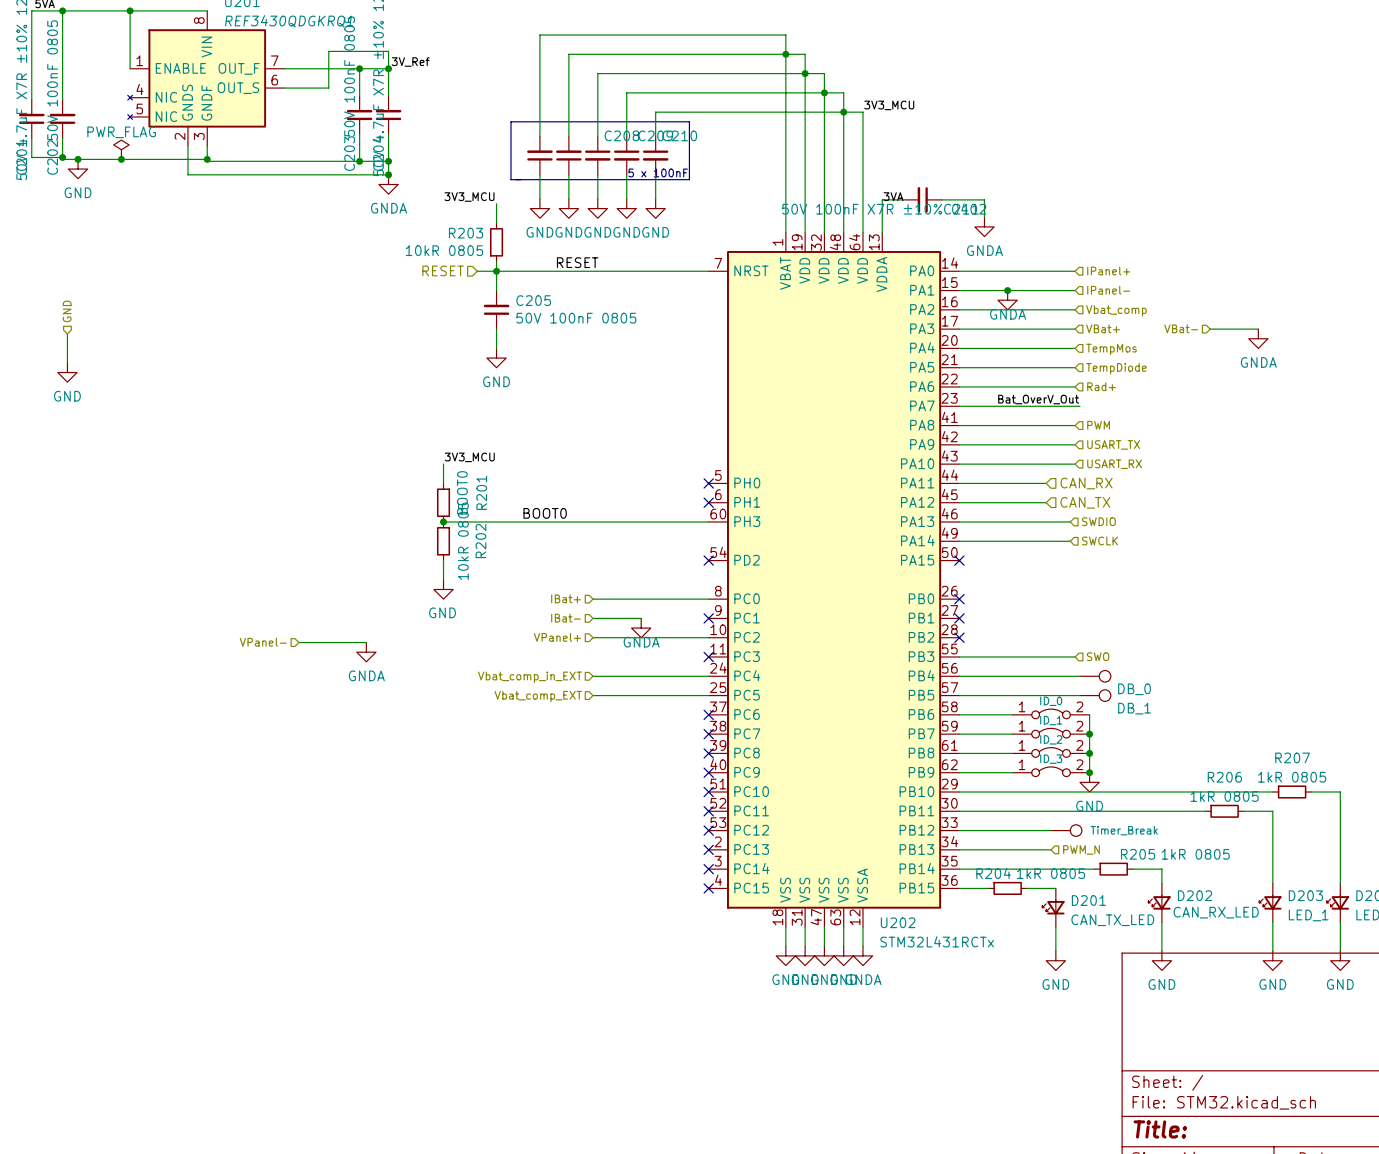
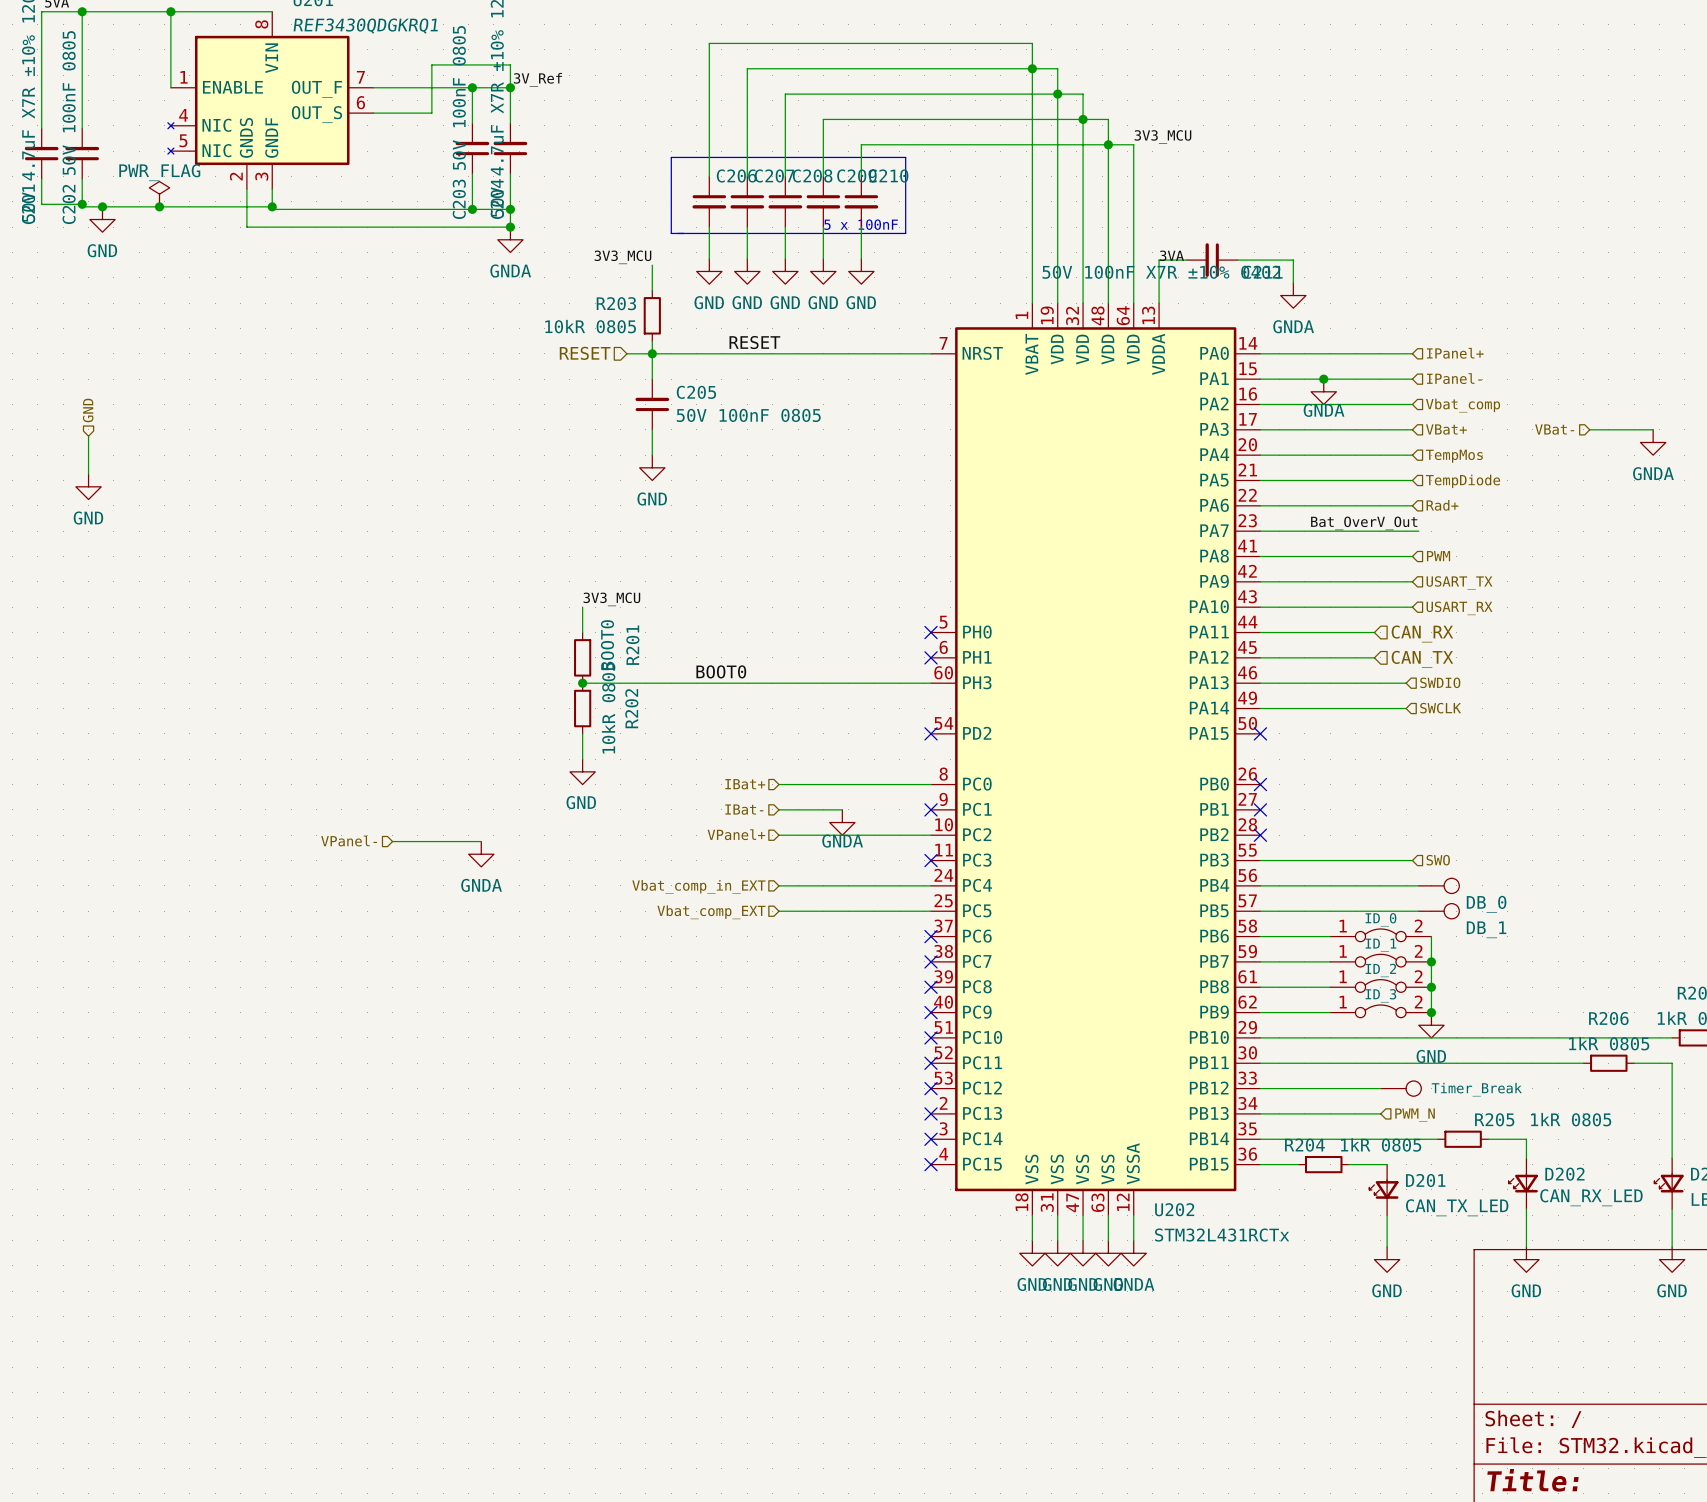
C206: none -> (709, 201)
part: (568, 155) -> none
C207: none -> (747, 201)

